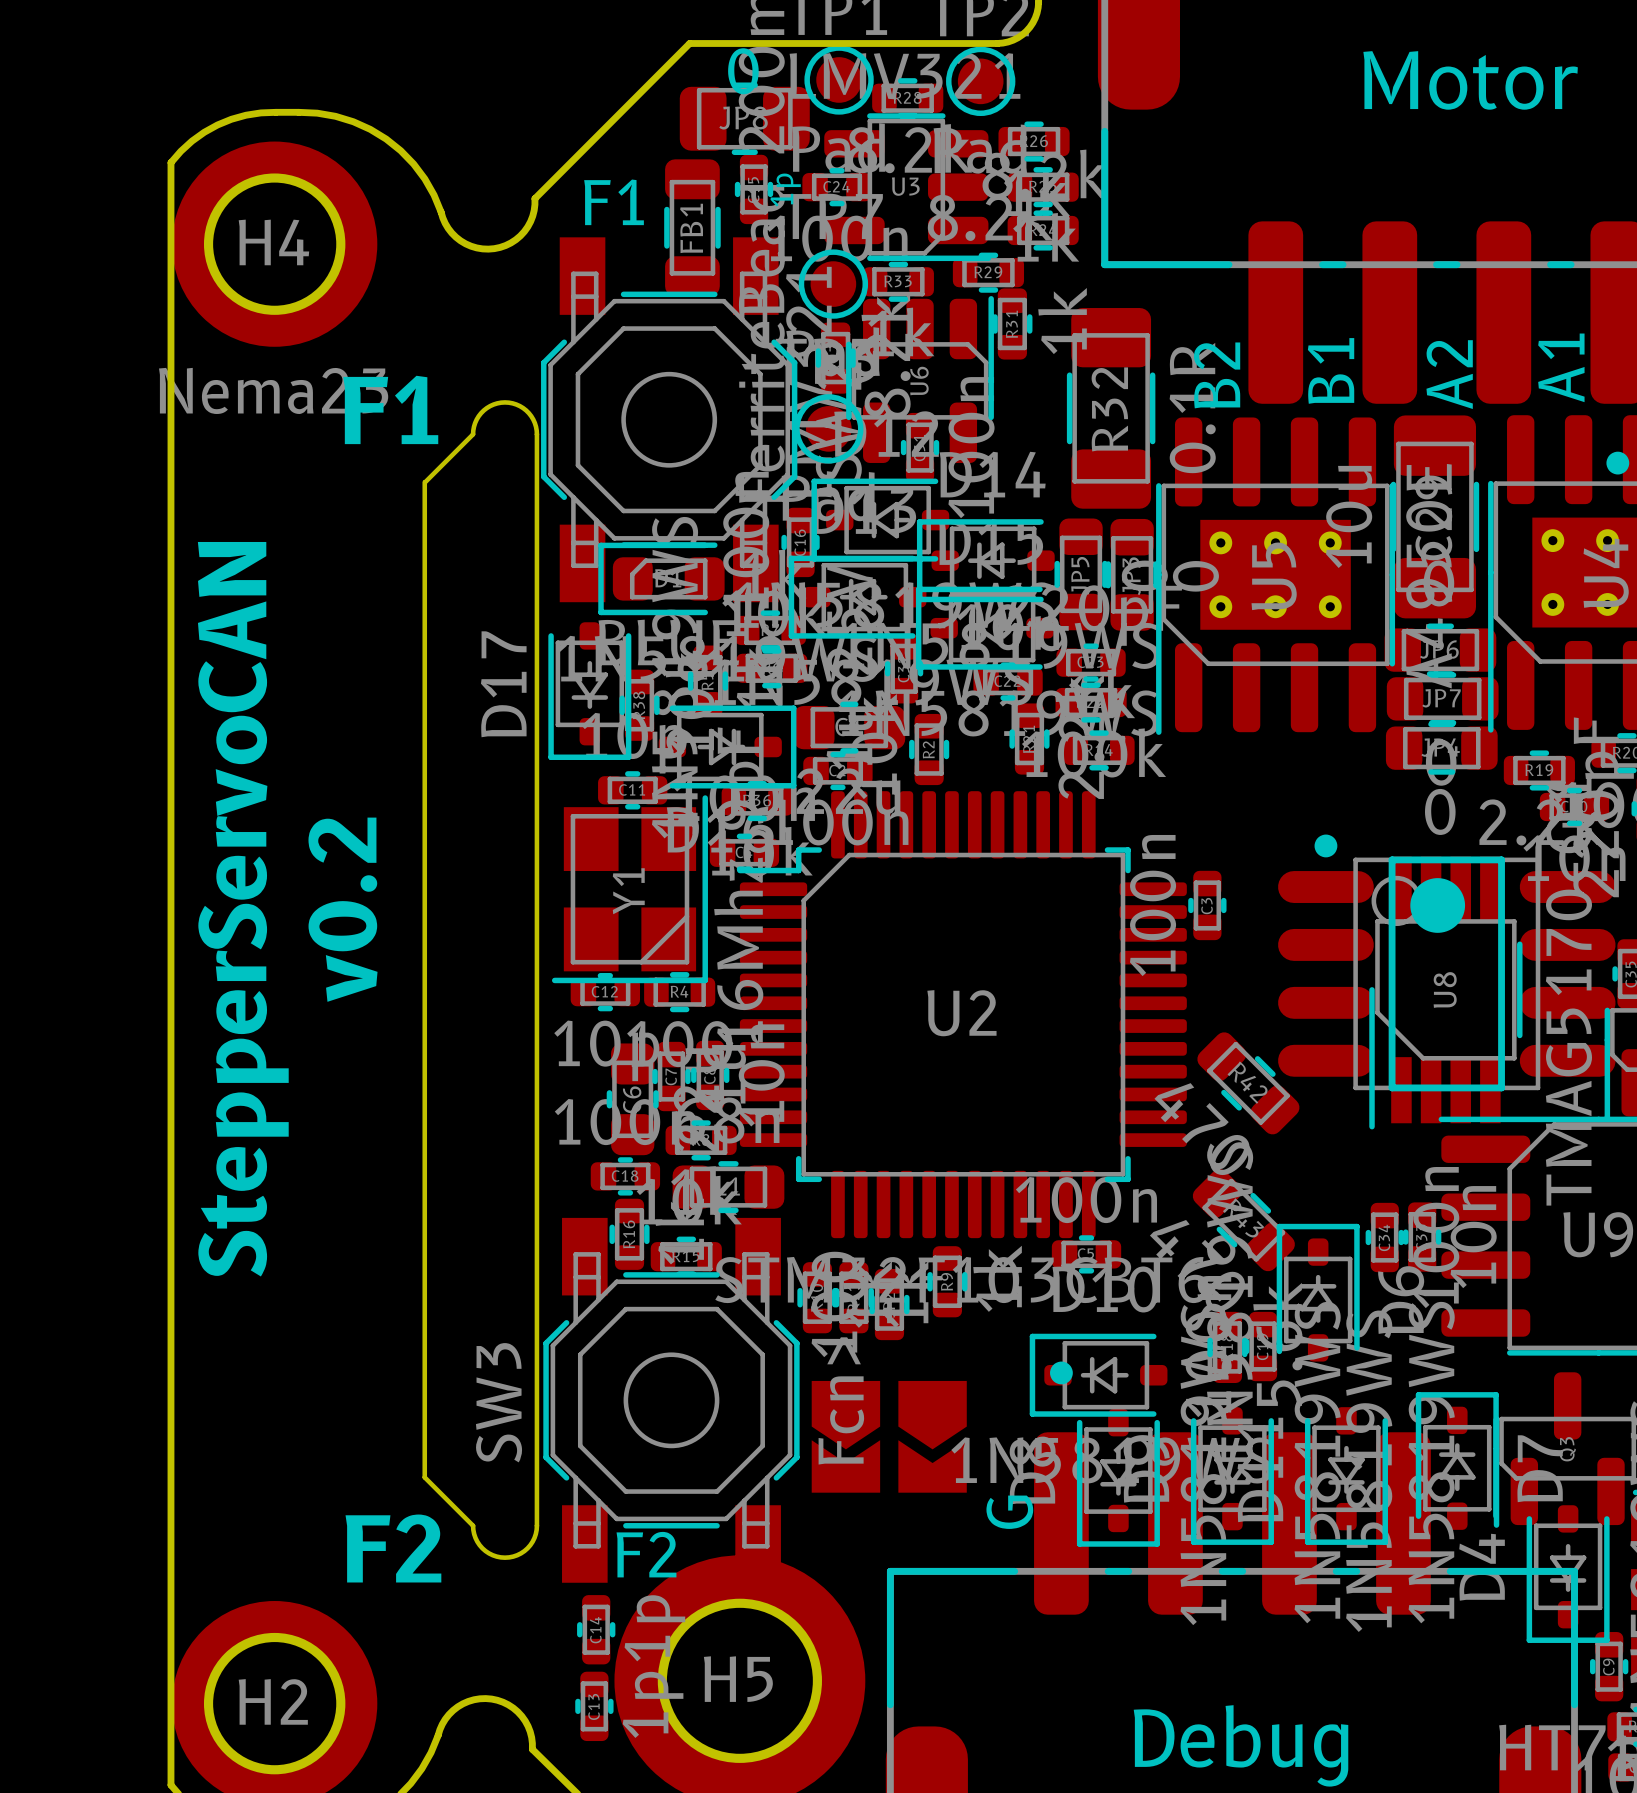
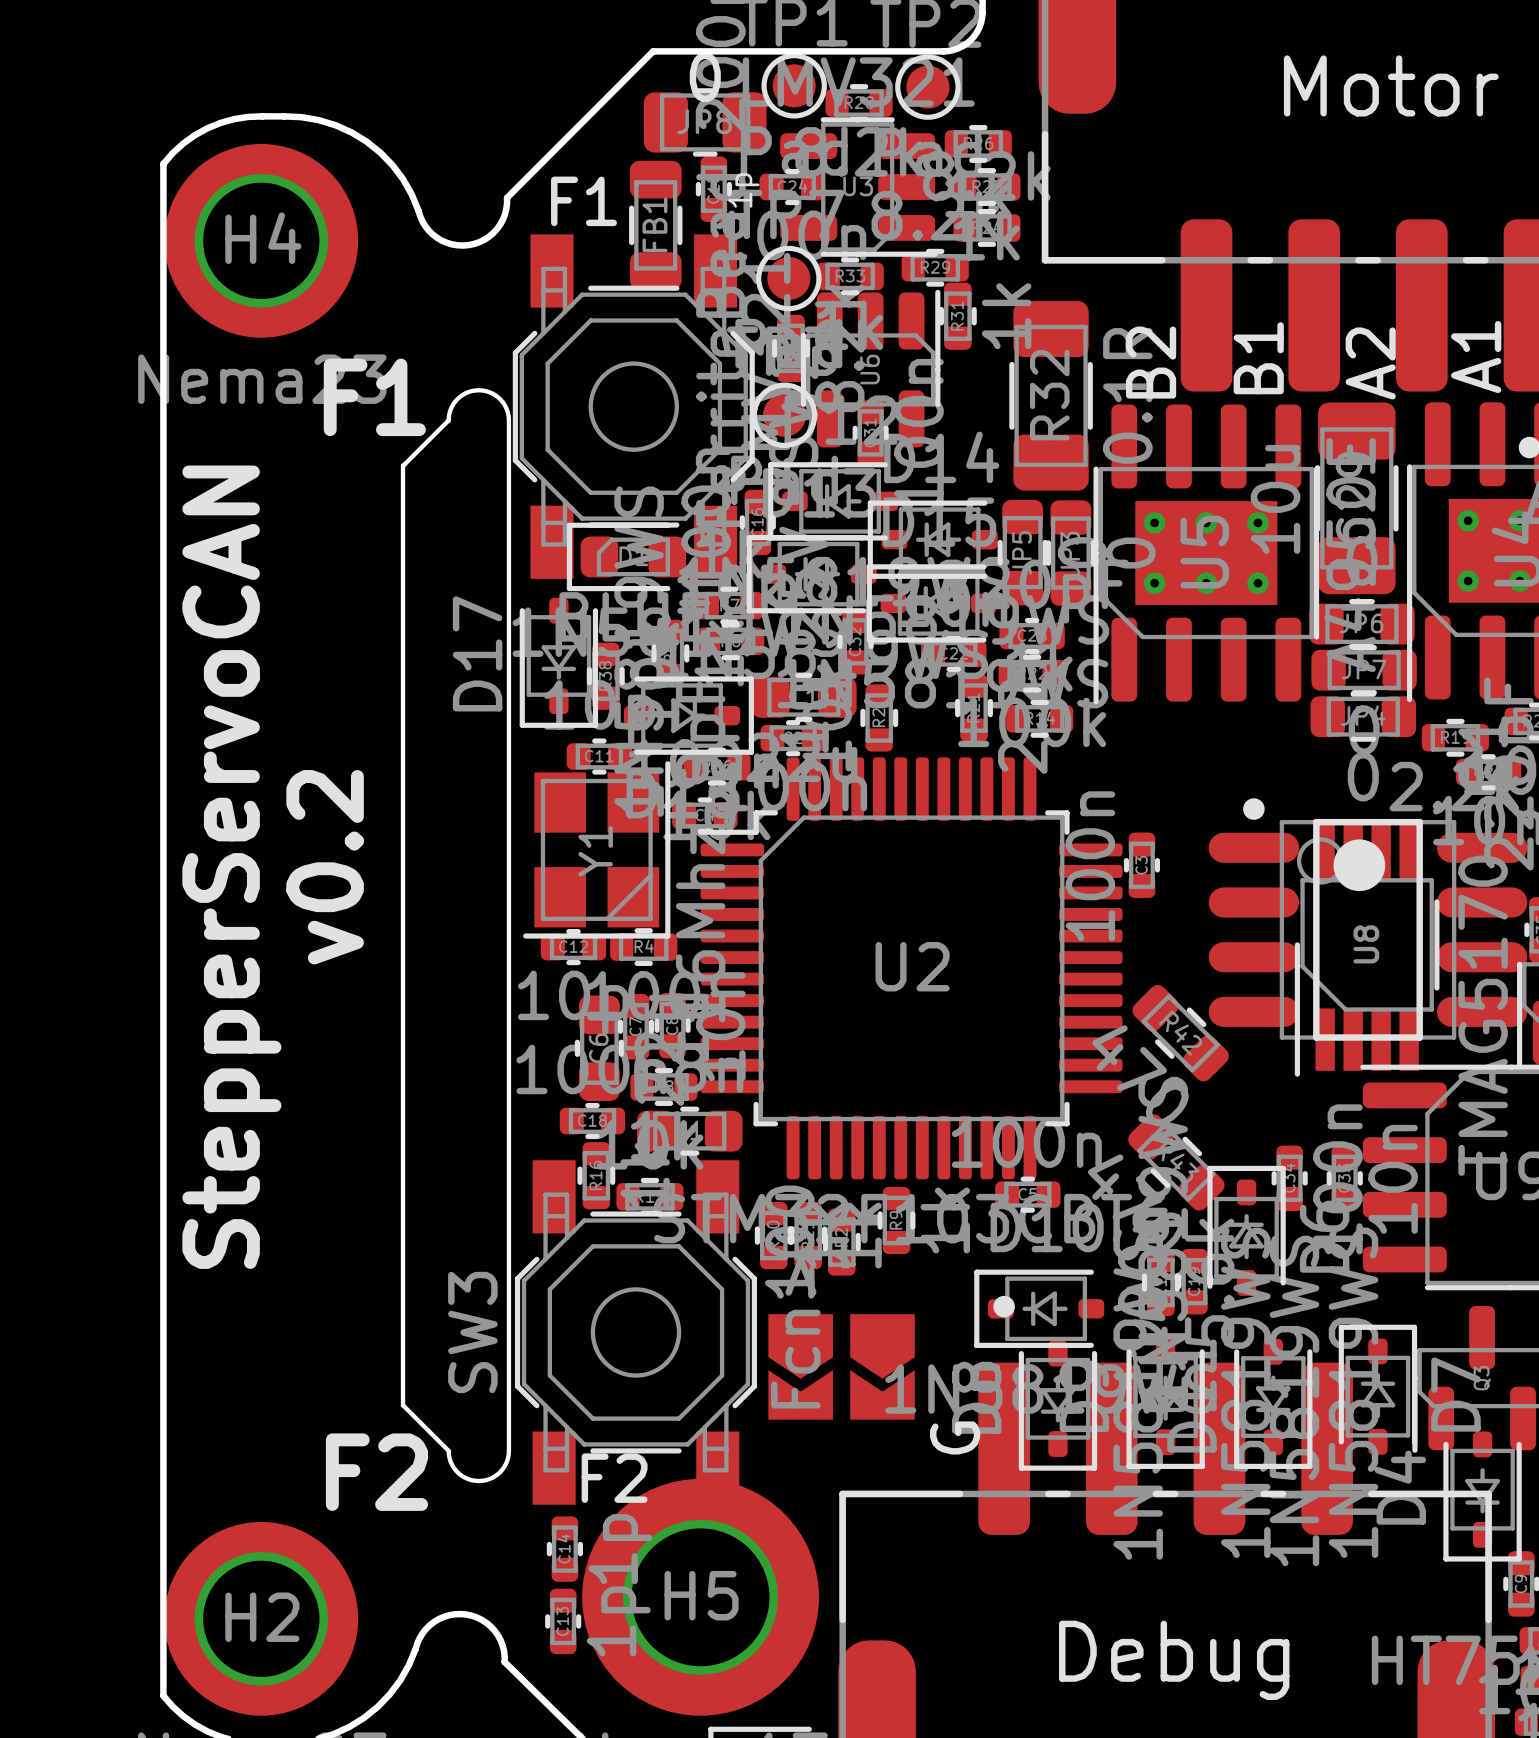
C34 position: (1384, 1237) -> (1289, 1178)

